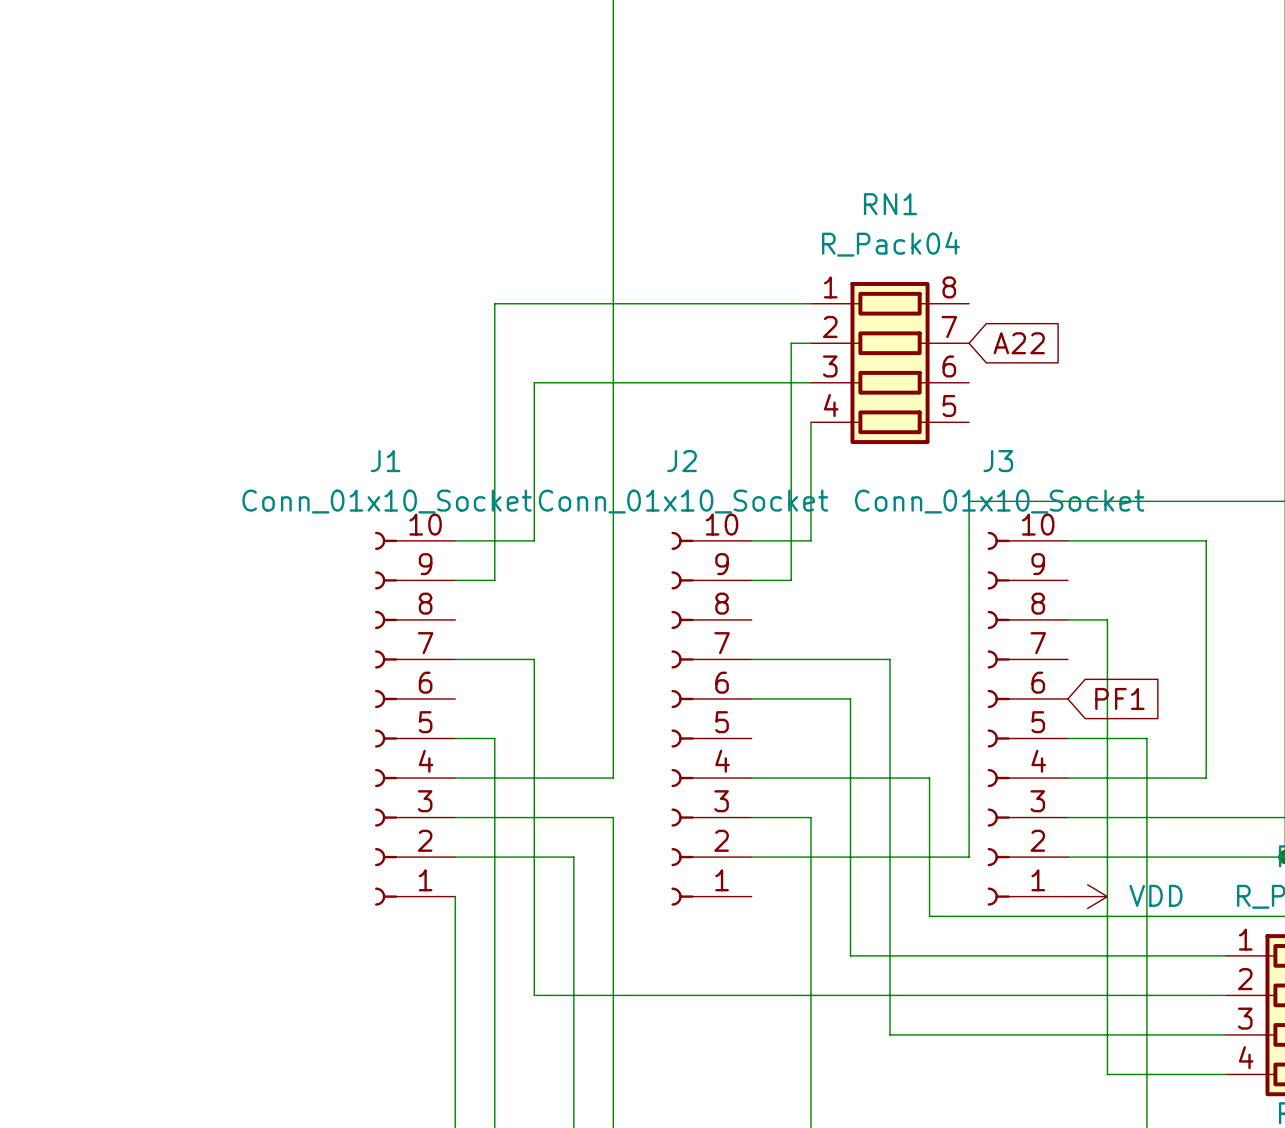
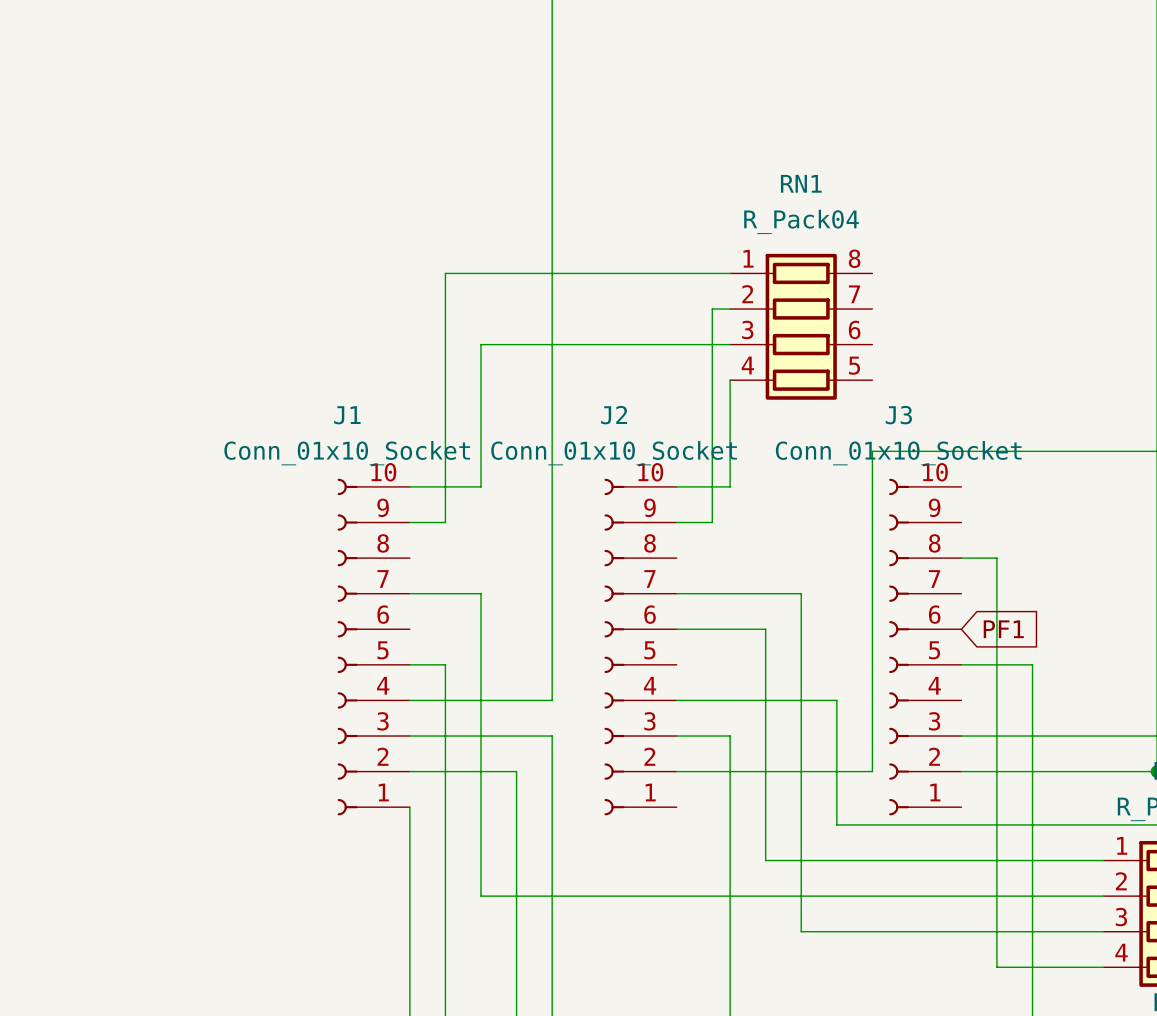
global label: A22 (1019, 343) -> none
wire: (1067, 540) (1206, 540) (1206, 778) (1067, 778) -> none
power symbol: VDD (1087, 896) -> none

